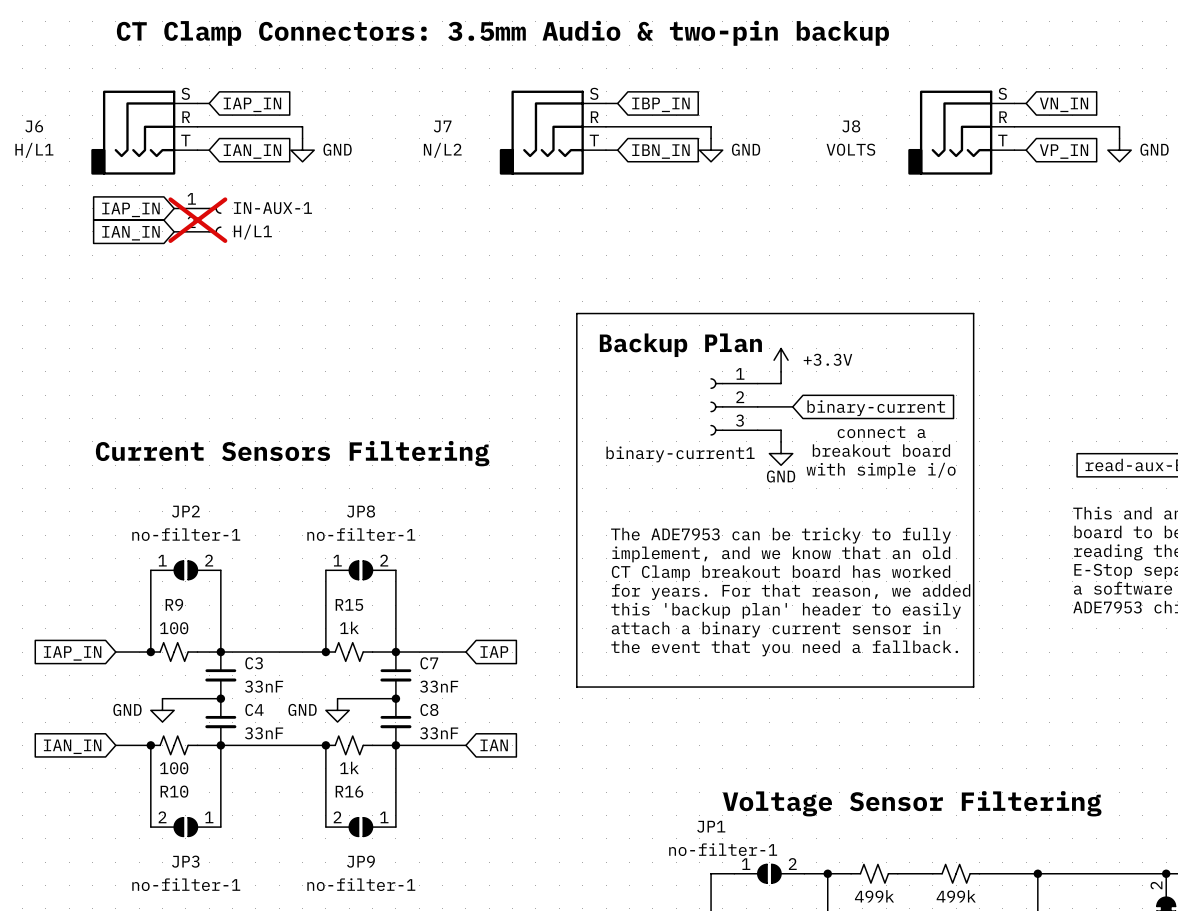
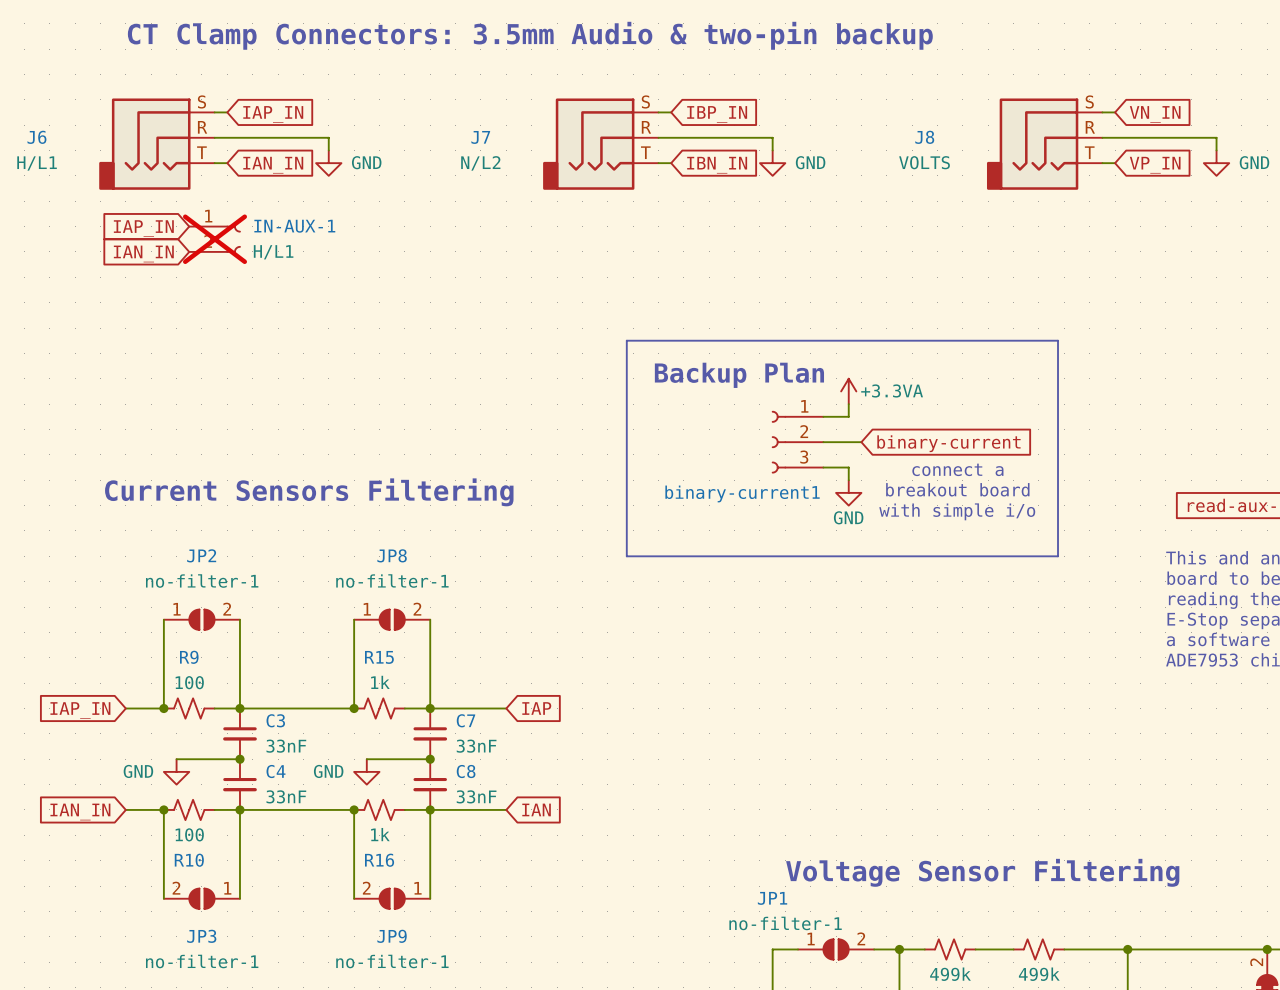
power symbol: +3.3V (781, 360) -> +3.3VA (848, 391)
line: (576, 511) (576, 687) (973, 687) (973, 511) -> (626, 556) (1058, 556)
text: The ADE7953 can be tricky to fully (780, 535) -> none
text: implement, and we know that an old (781, 554) -> none
text: CT Clamp breakout board has worked (781, 573) -> none
text: for years. For that reason, we added (791, 592) -> none
text: this 'backup plan' header to easily (786, 610) -> none
text: attach a binary current sensor in (775, 629) -> none
text: the event that you need a fallback. (784, 648) -> none

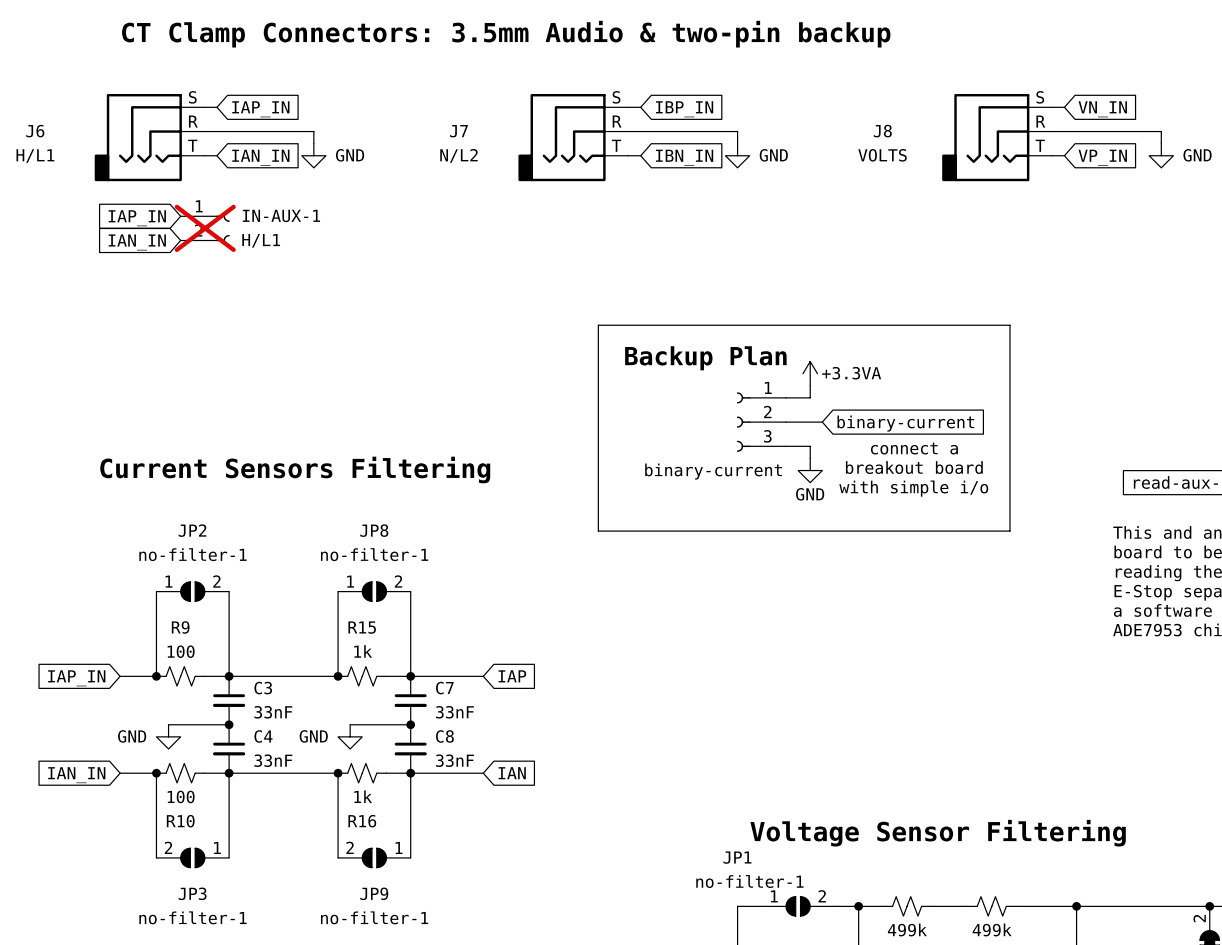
binary-current1 name: binary-current1 (742, 493) -> binary-current (713, 471)

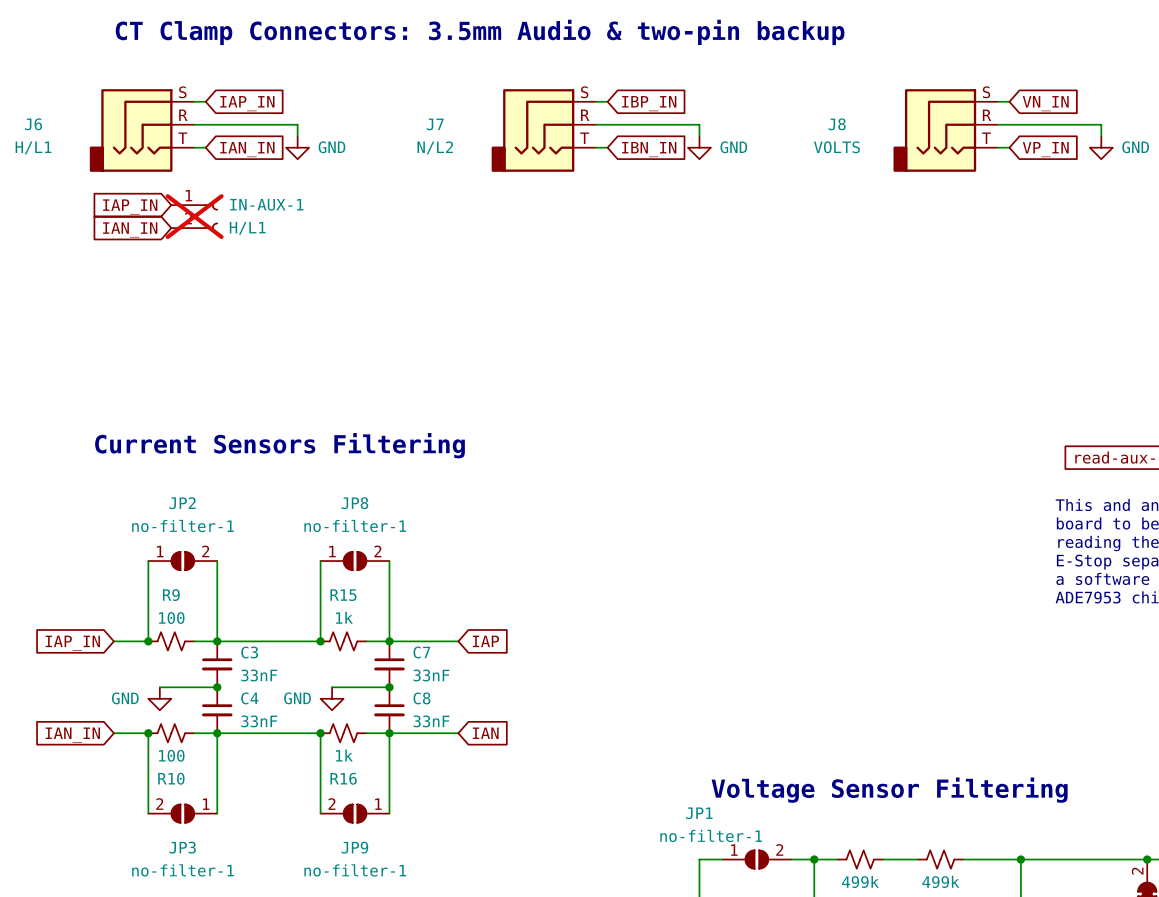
line: (598, 325) (1009, 325) (1009, 531) (598, 531) (598, 325) -> none
text: Backup Plan (705, 358) -> none
power symbol: +3.3VA (810, 373) -> none
wire: (810, 385) (810, 397) (786, 397) -> none
binary-current: (761, 422) -> none
wire: (786, 422) (822, 422) -> none
global label: binary-current (905, 423) -> none
wire: (786, 446) (810, 446) (810, 458) -> none
text: connect a (914, 448) -> none
text: breakout board (914, 467) -> none
power symbol: GND (810, 470) -> none
text: with simple i/o (913, 488) -> none

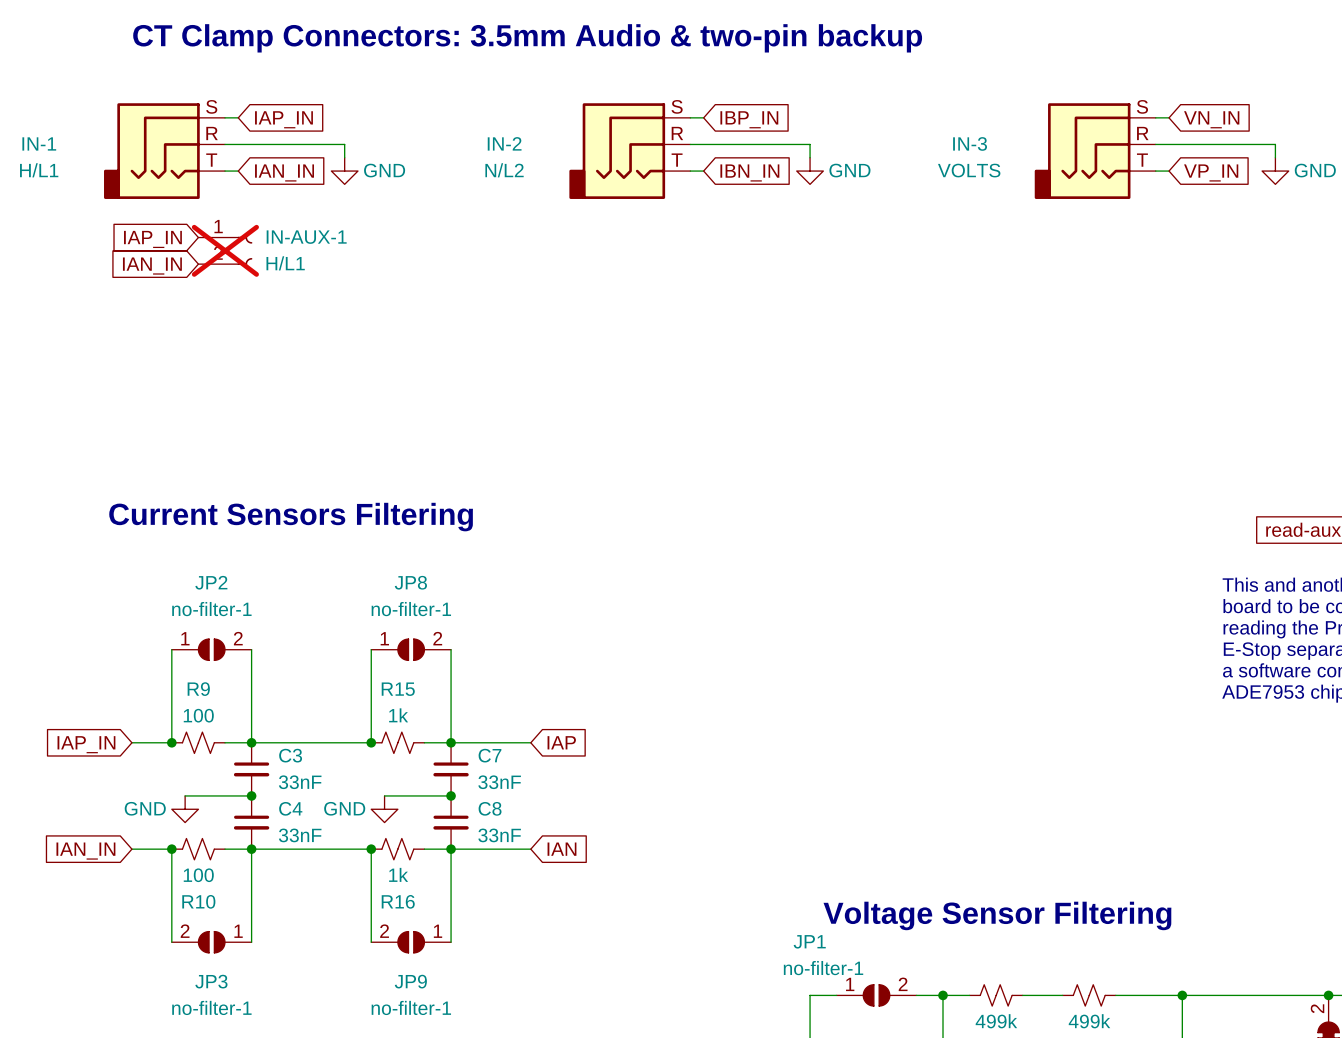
J6 name: J6 (33, 124) -> IN-1 (39, 143)
J7 name: J7 (435, 124) -> IN-2 (504, 143)
J8 name: J8 (837, 124) -> IN-3 (970, 143)

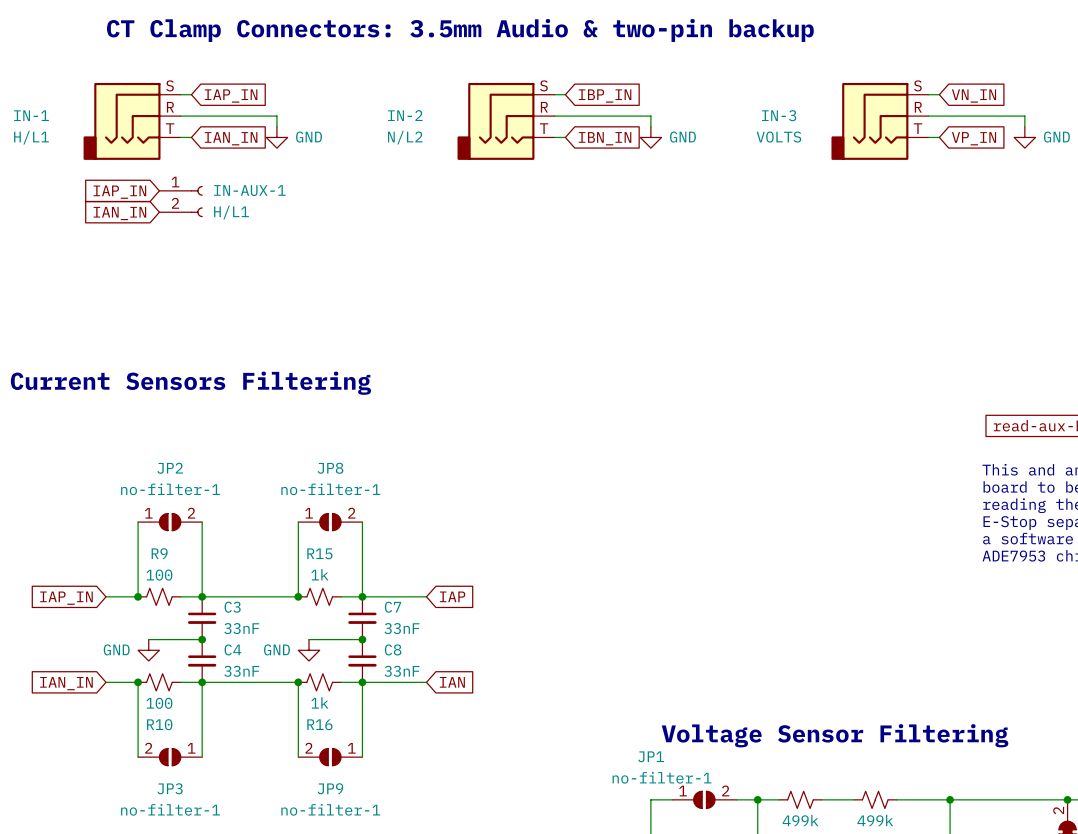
IN-AUX-1 do-not-place cross: (225, 250) -> none
text position: Current Sensors Filtering (291, 517) -> Current Sensors Filtering (190, 383)

